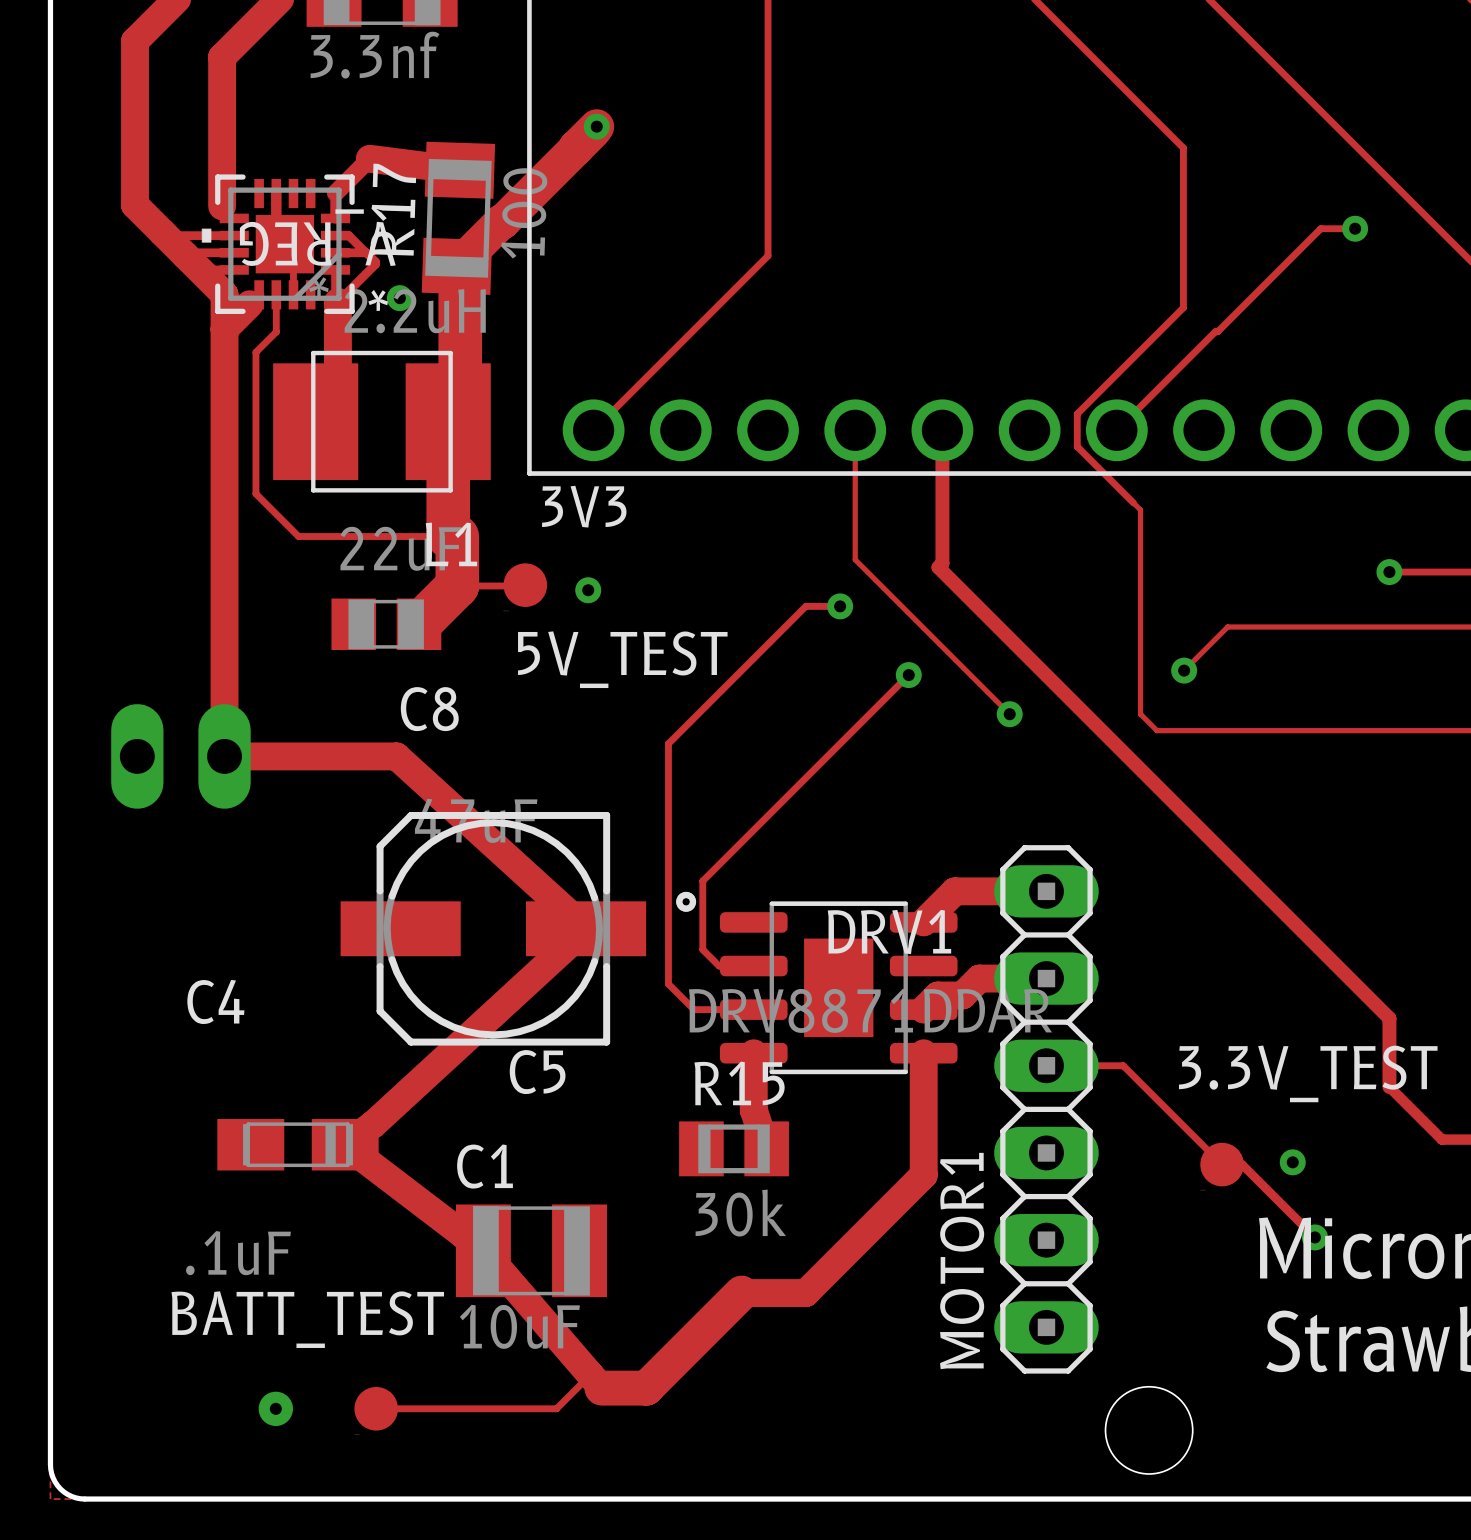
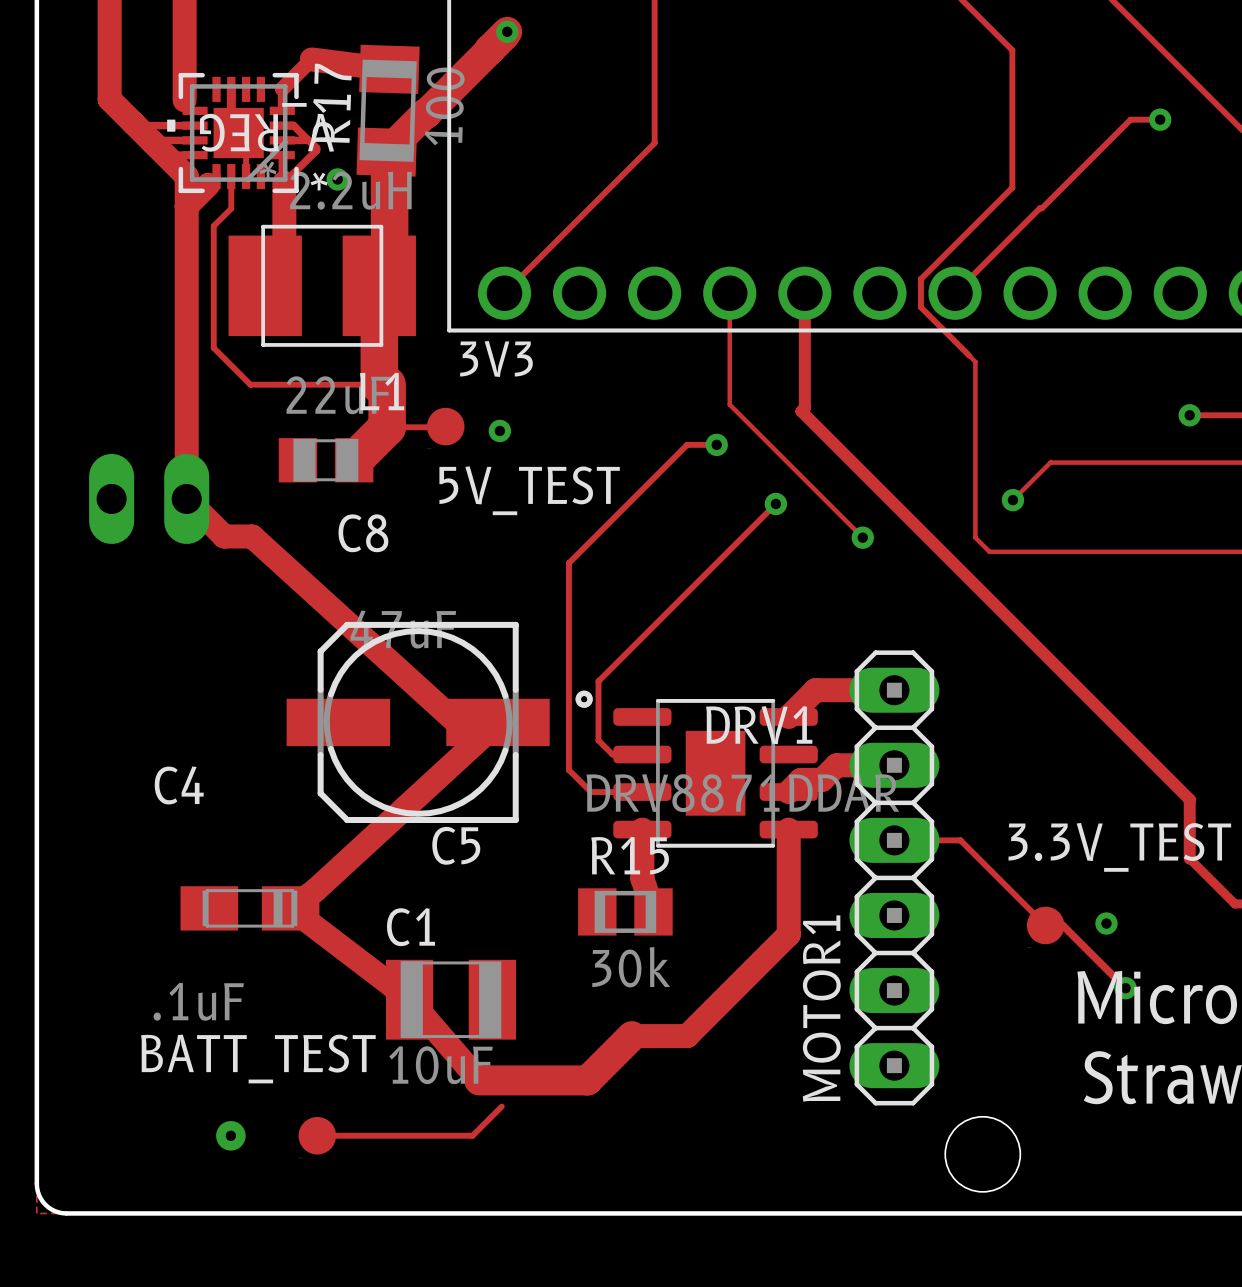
track: (224, 669) (224, 756) (396, 756) (586, 928) -> (186, 498) (224, 536) (252, 536) (456, 722) (497, 722)
part position: (180, 756) -> (149, 498)
track: (564, 1344) (601, 1388) (646, 1388) (690, 1344) -> (479, 1080) (587, 1080)

